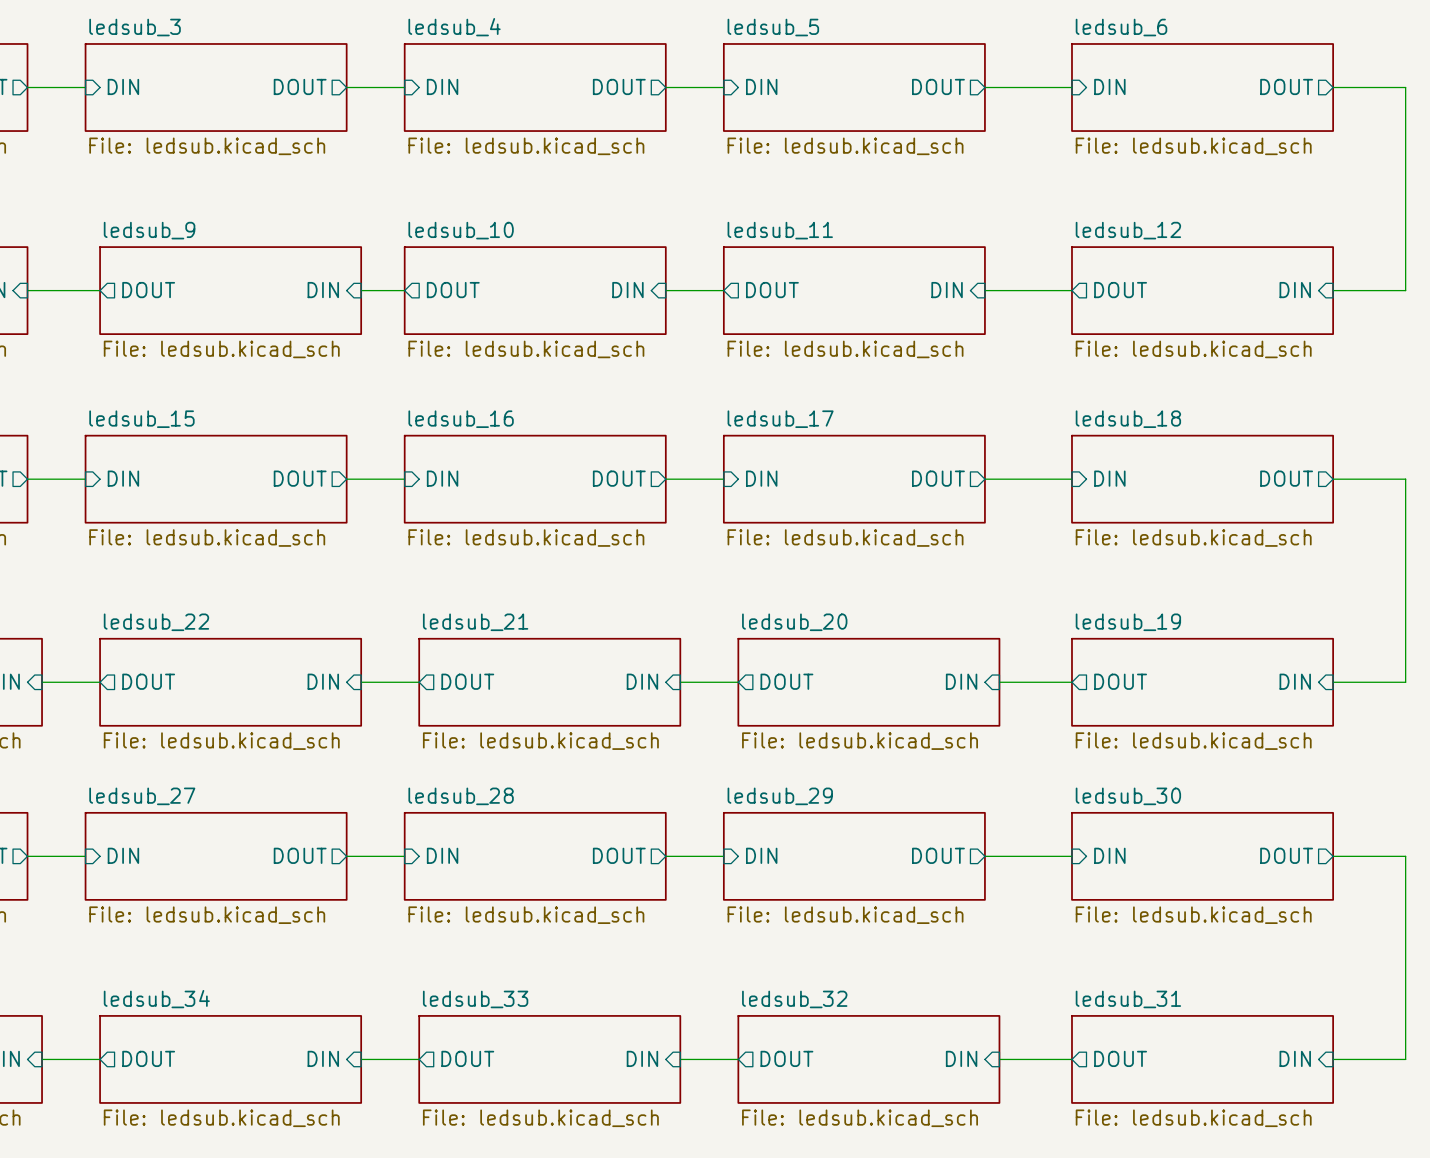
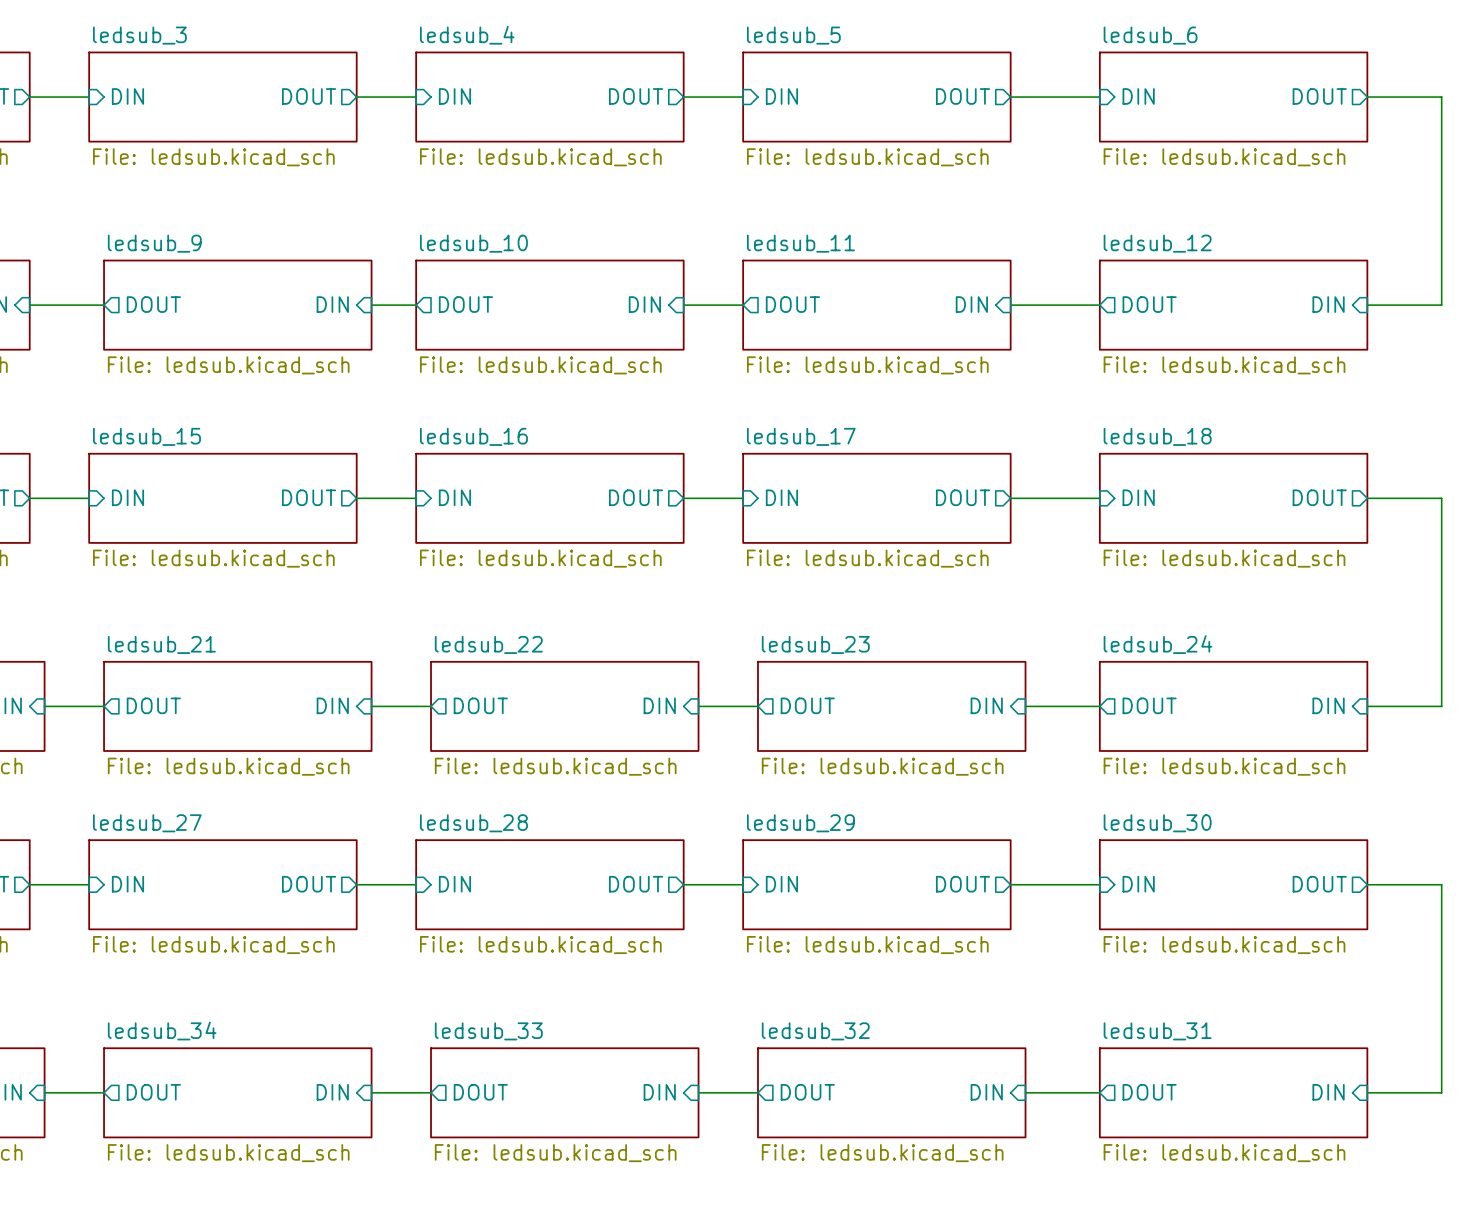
sheet ledsub_22 name: ledsub_22 (156, 622) -> ledsub_21 (161, 644)
sheet ledsub_21 name: ledsub_21 (475, 622) -> ledsub_22 (488, 644)
sheet ledsub_20 name: ledsub_20 (794, 622) -> ledsub_23 (815, 644)
sheet ledsub_19 name: ledsub_19 (1128, 622) -> ledsub_24 (1157, 644)

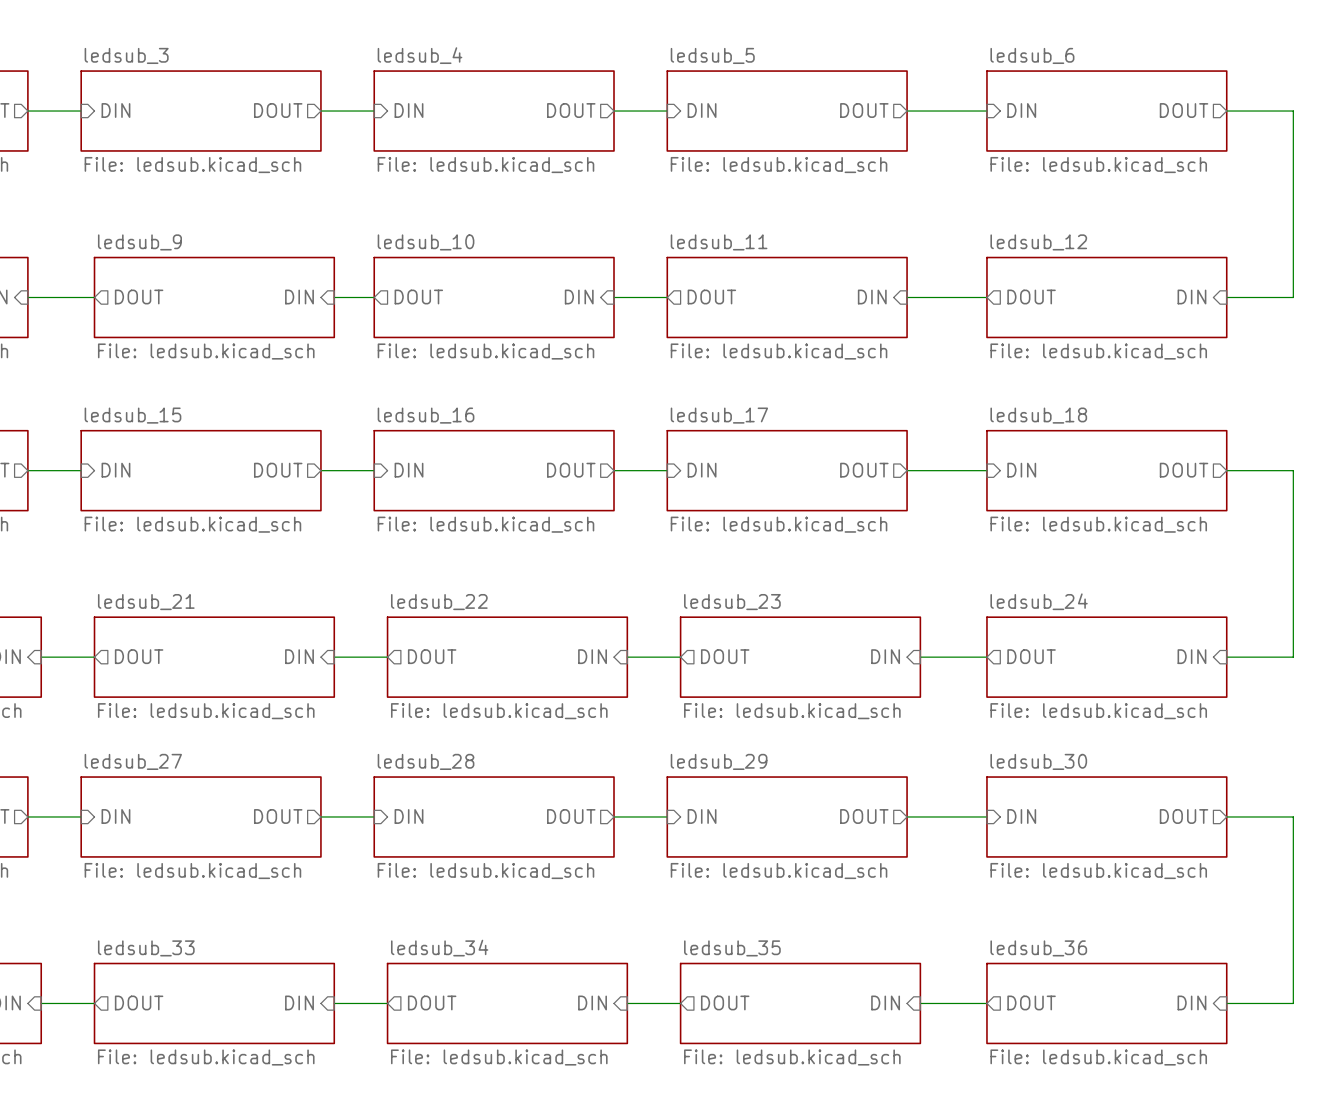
sheet ledsub_34 name: ledsub_34 (162, 1031) -> ledsub_33 (146, 948)
sheet ledsub_33 name: ledsub_33 (488, 1031) -> ledsub_34 (439, 948)
sheet ledsub_32 name: ledsub_32 (815, 1031) -> ledsub_35 (732, 948)
sheet ledsub_31 name: ledsub_31 (1157, 1031) -> ledsub_36 (1038, 948)

